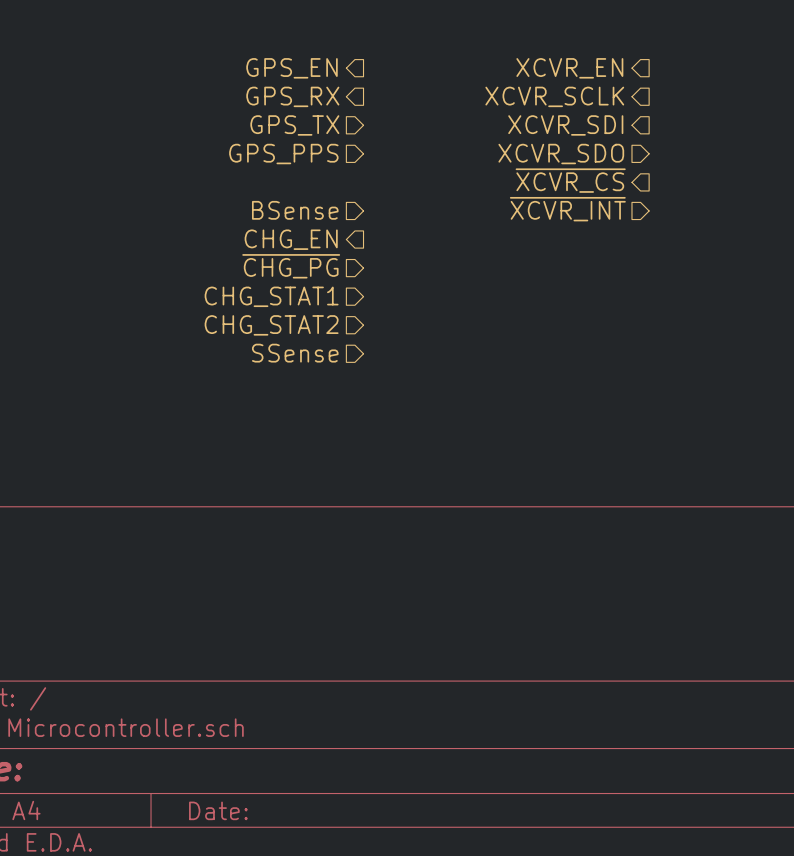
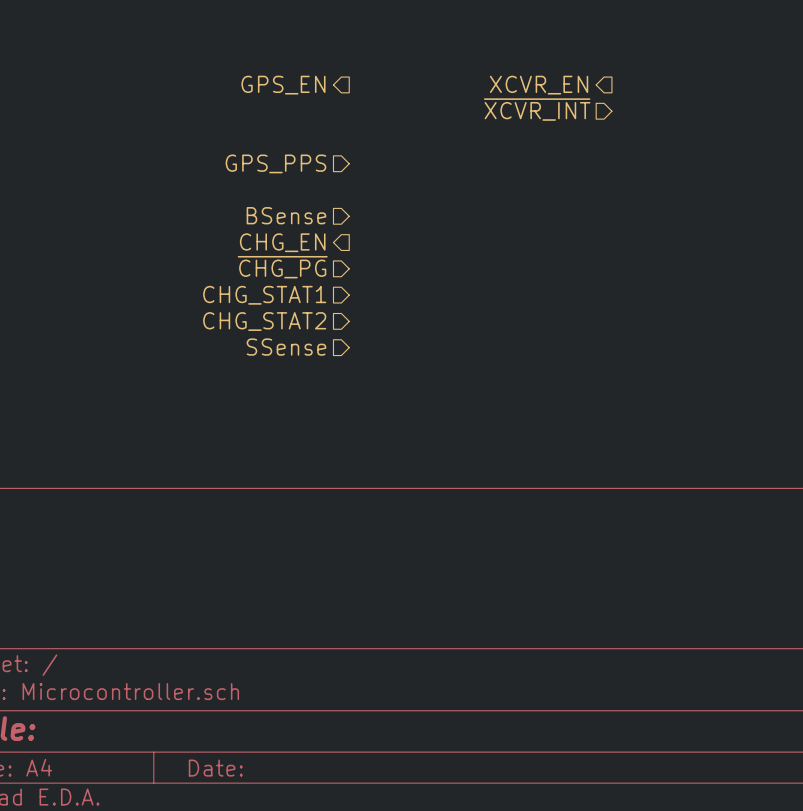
hierarchical label: GPS_RX (292, 96) -> none
hierarchical label shape: output (554, 96) -> input (537, 109)
hierarchical label: XCVR_SCLK (554, 96) -> ~{XCVR_INT} (537, 109)
hierarchical label: GPS_TX (294, 125) -> none
hierarchical label: XCVR_SDI (565, 125) -> none
hierarchical label: XCVR_SDO (561, 154) -> none
hierarchical label: ~{XCVR_CS} (570, 180) -> none
hierarchical label: ~{XCVR_INT} (567, 209) -> none

